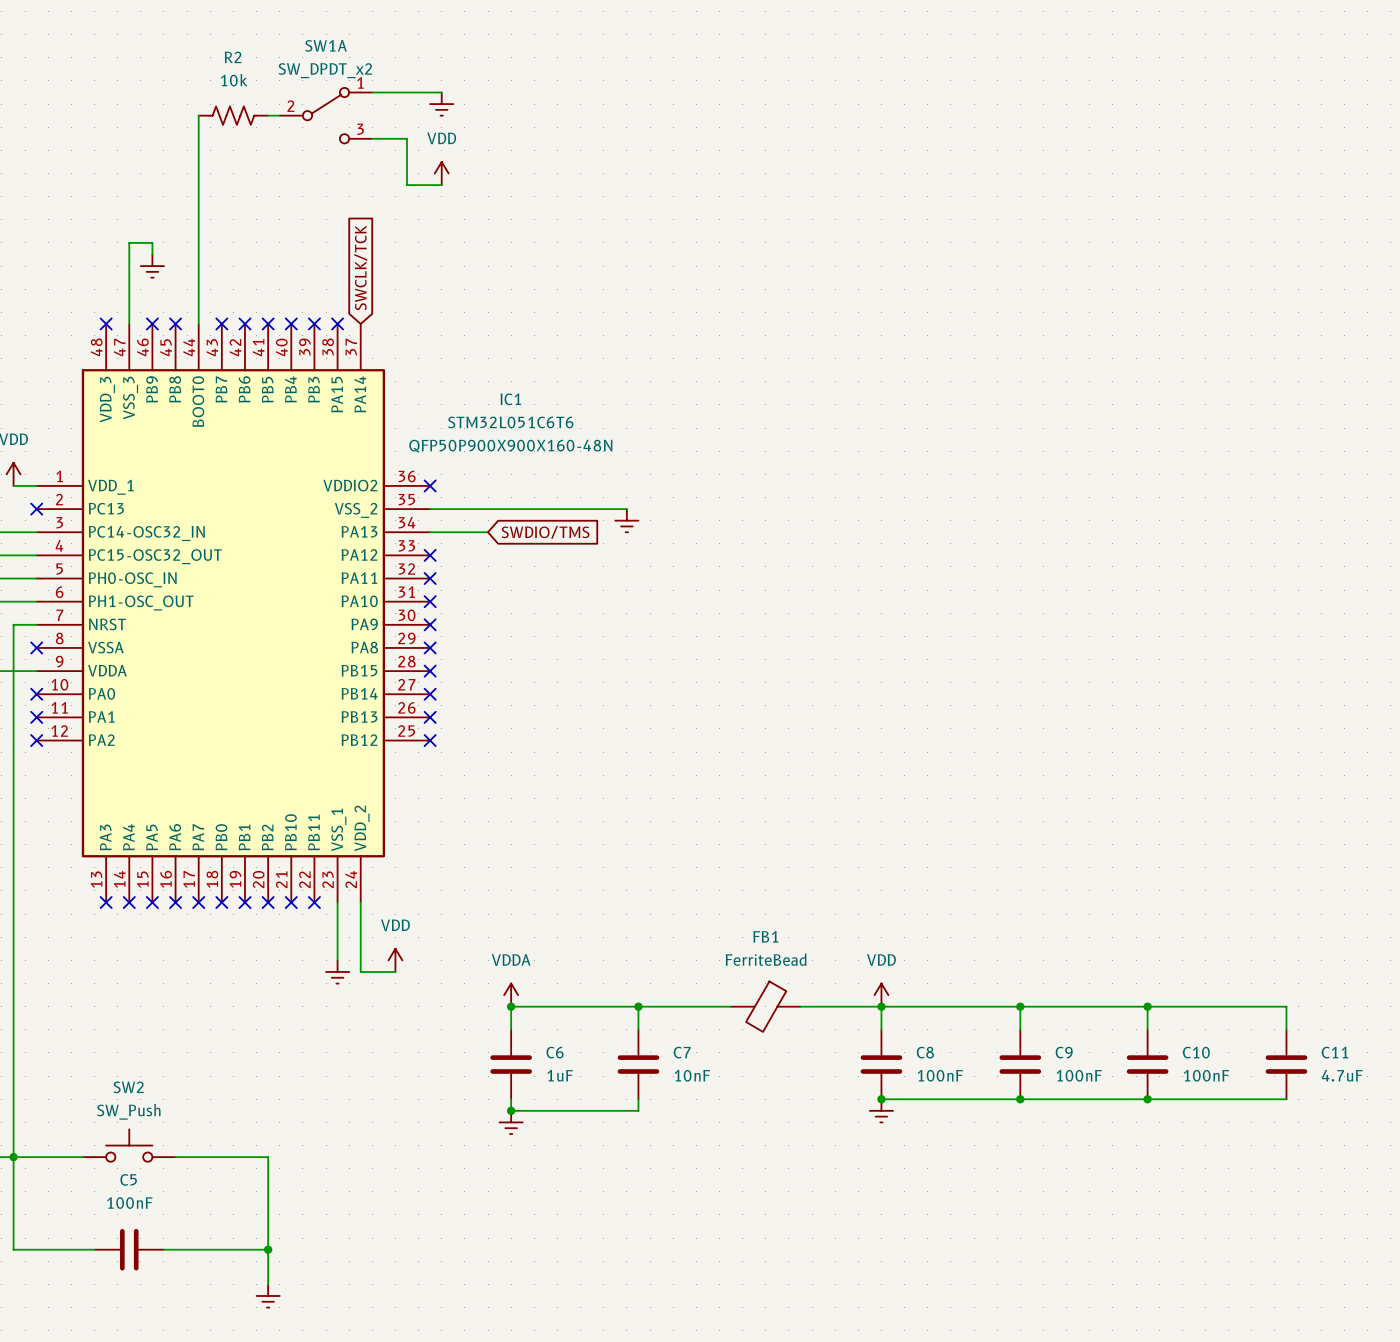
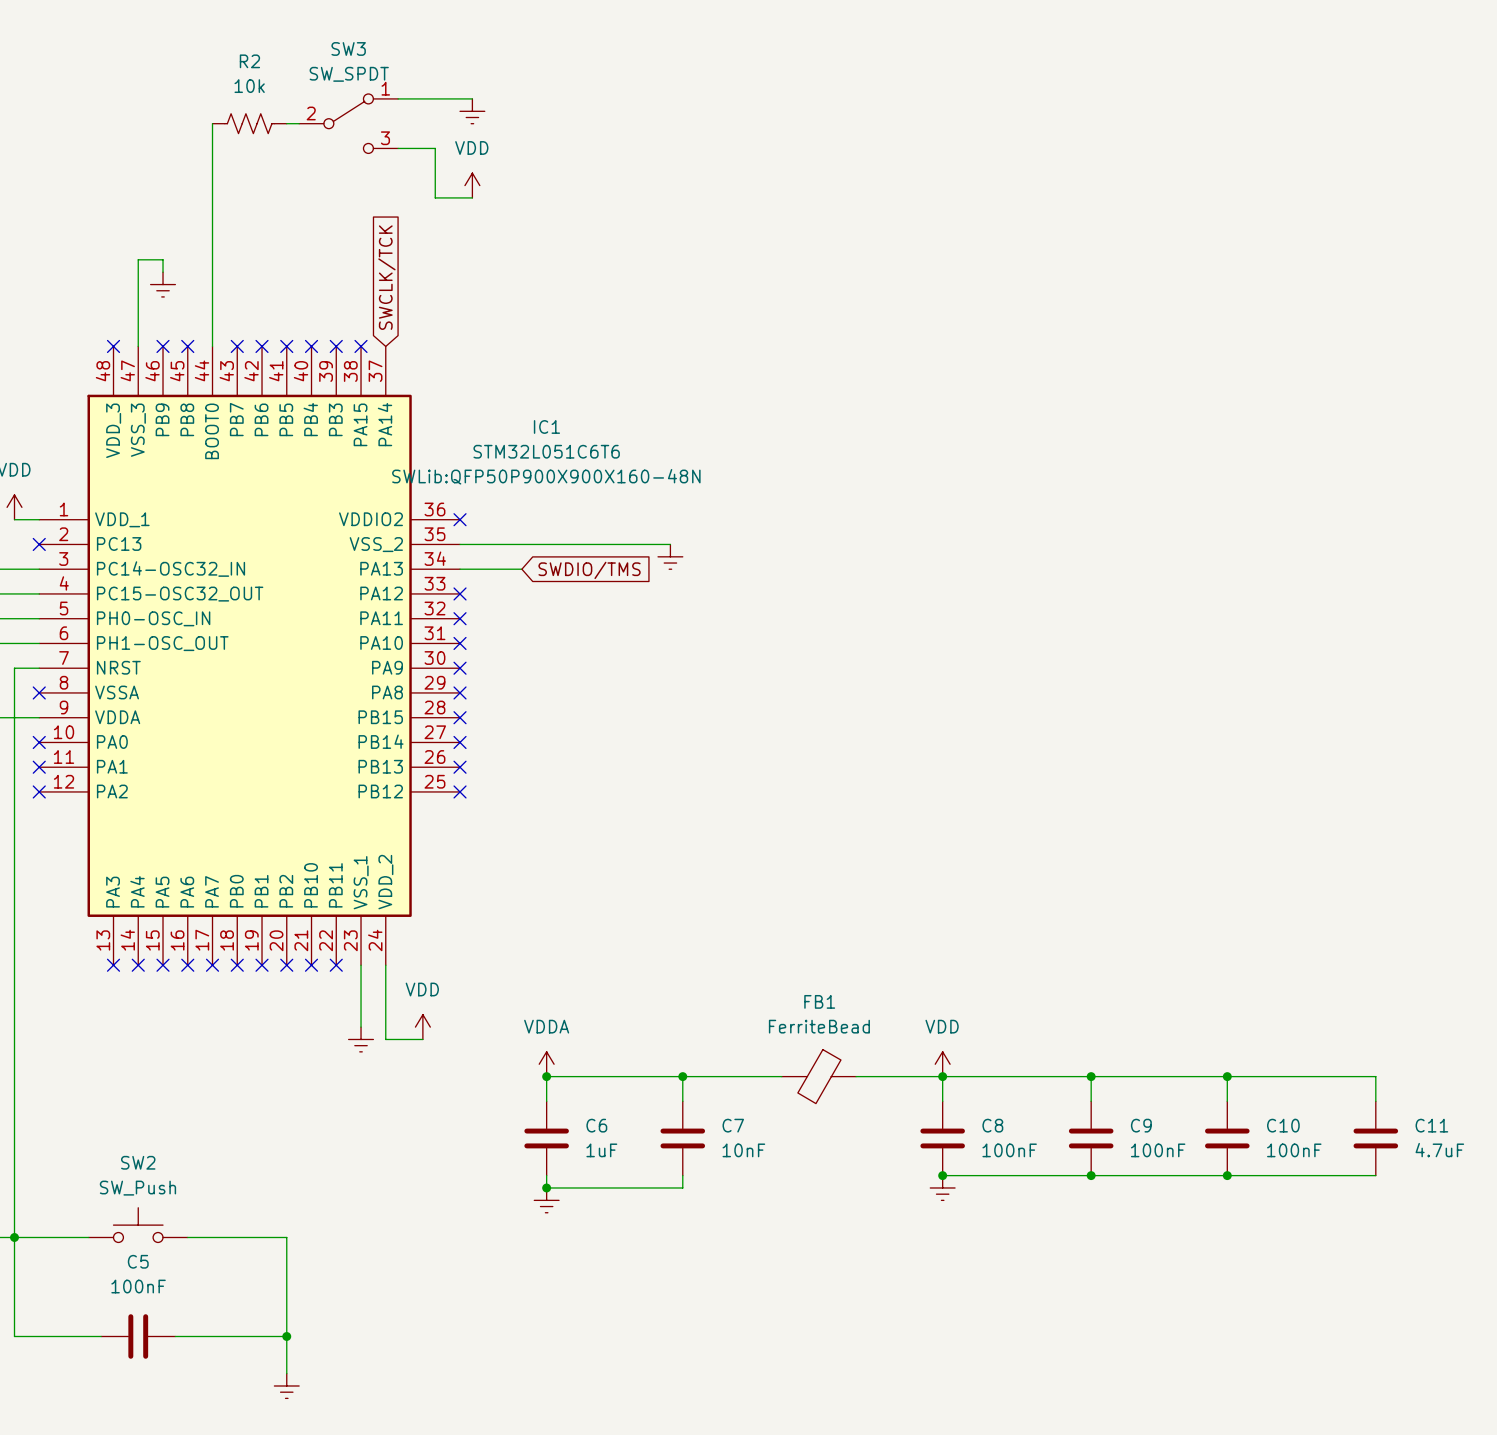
SW1A name: SW1A (326, 45) -> SW3 (348, 48)
SW1A value: SW_DPDT_x2 (325, 70) -> SW_SPDT (349, 74)
IC1 text: QFP50P900X900X160-48N (510, 446) -> SWLib:QFP50P900X900X160-48N (546, 476)

